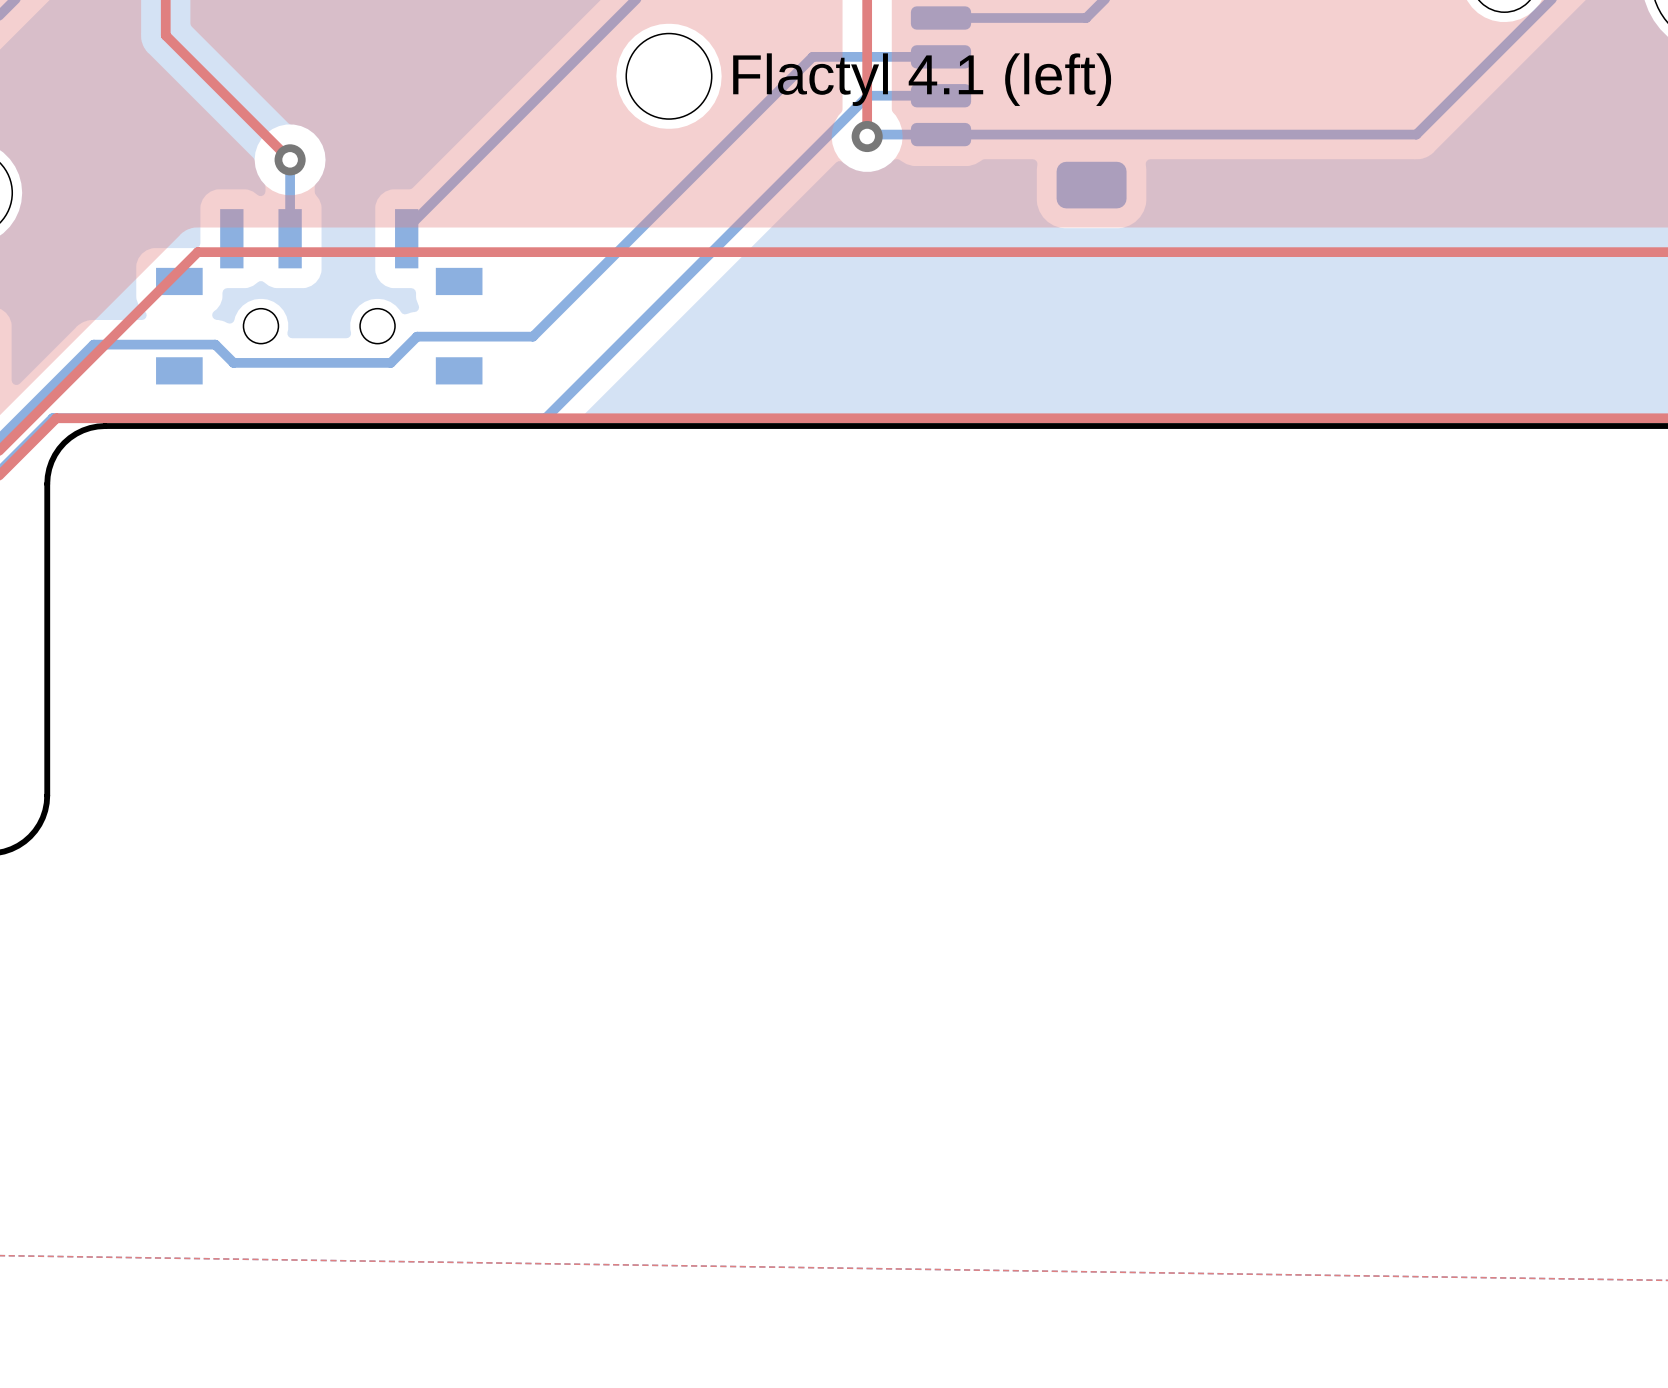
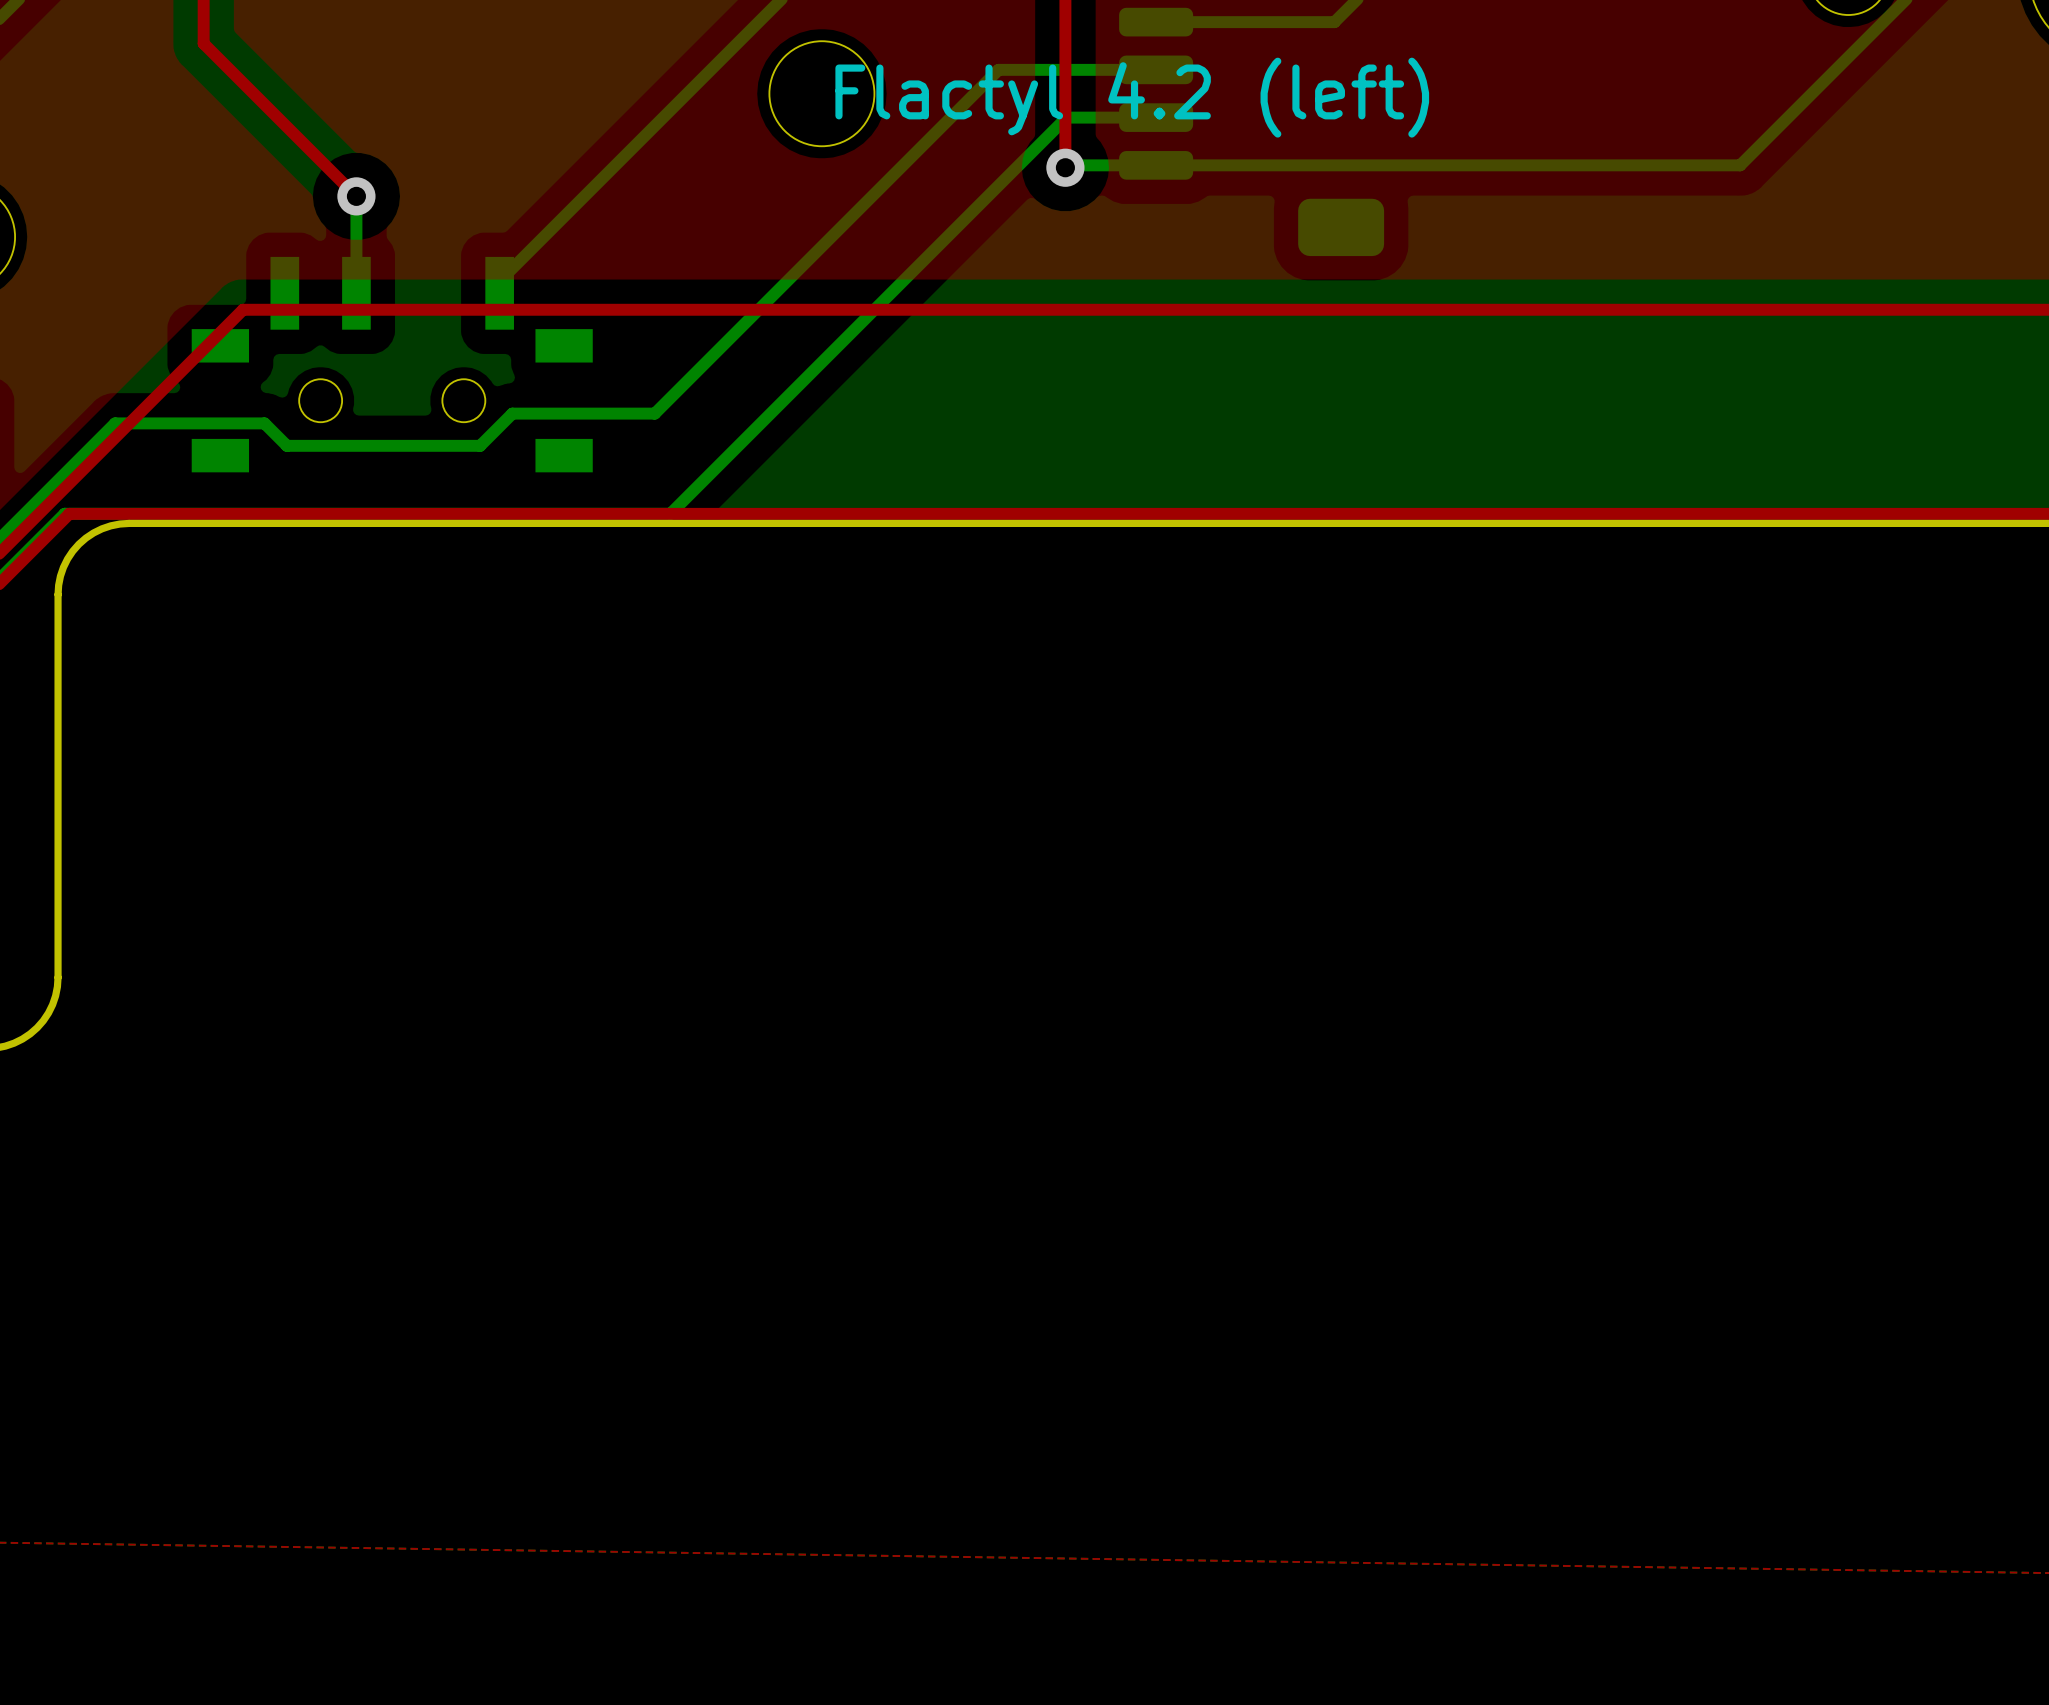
drawing shape: [733, 53, 1112, 106] -> [835, 57, 1430, 138]

